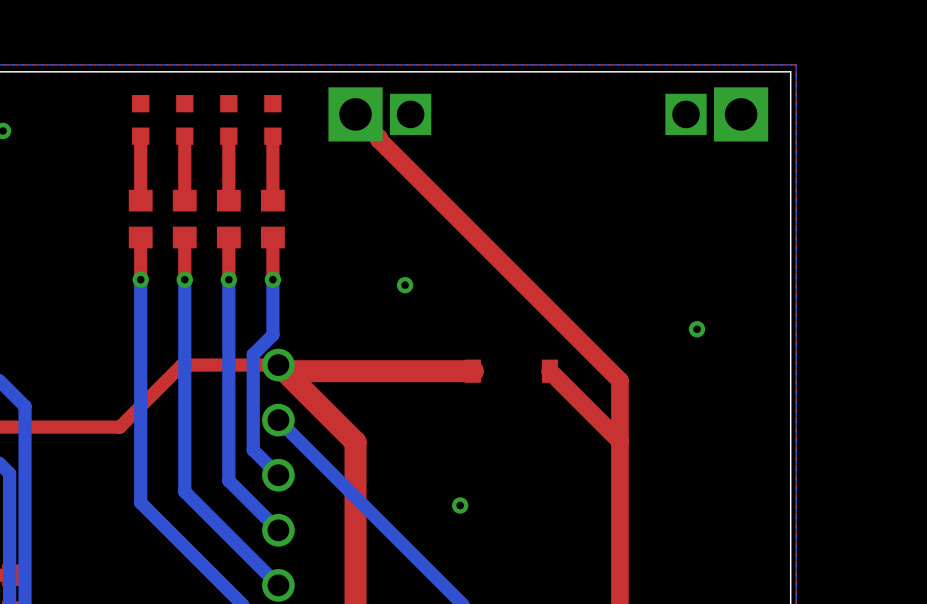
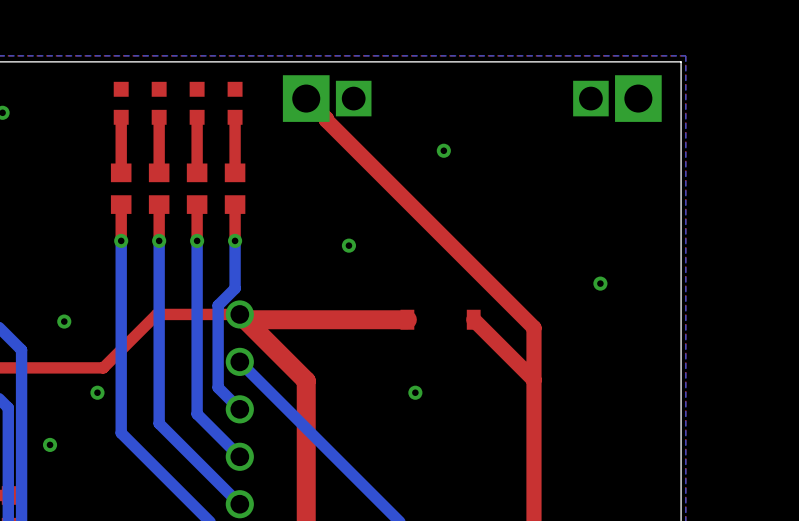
via: none -> (443, 150)
via: none -> (64, 321)
via: none -> (97, 392)
via position: (460, 505) -> (415, 392)
via: none -> (50, 444)

